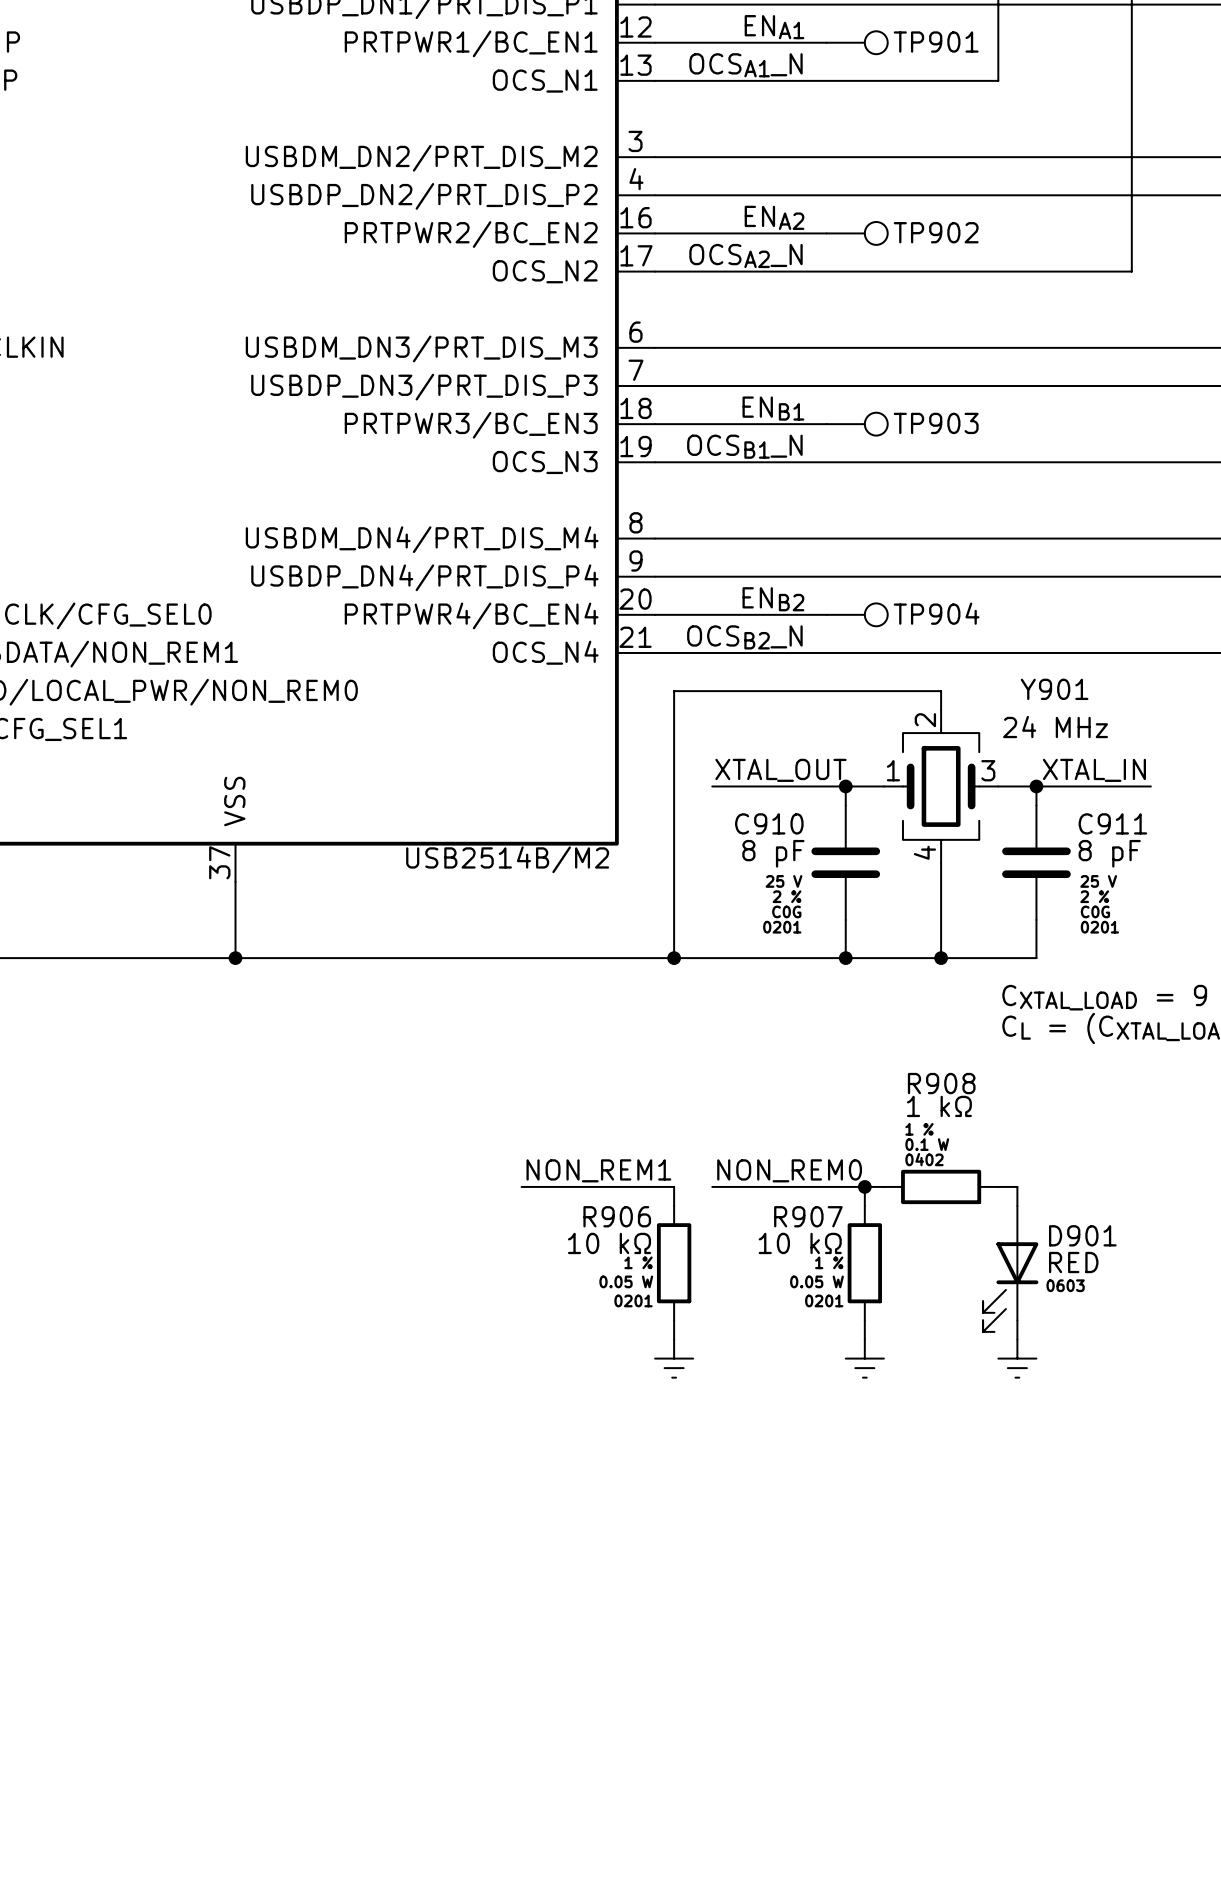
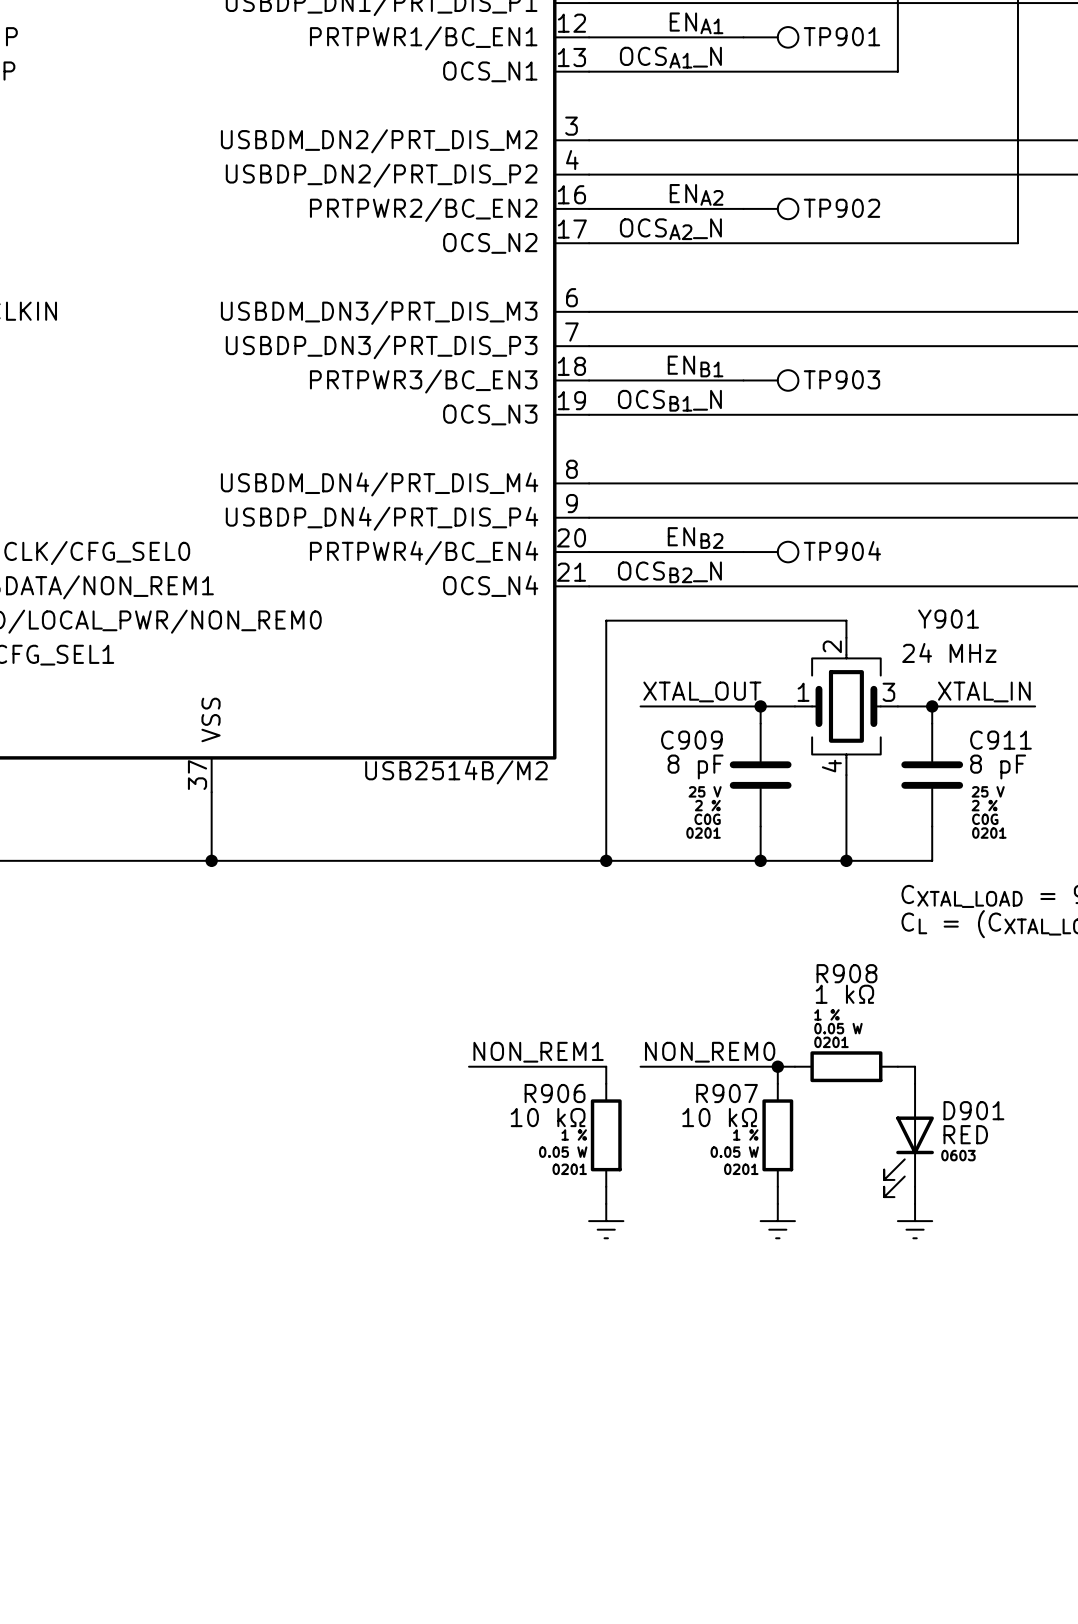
C910 name: C910 (769, 823) -> C909 (691, 740)
R908 text: 0.1 W (927, 1144) -> 0.05 W (838, 1028)
R908 text: 0402 (924, 1159) -> 0201 (831, 1042)

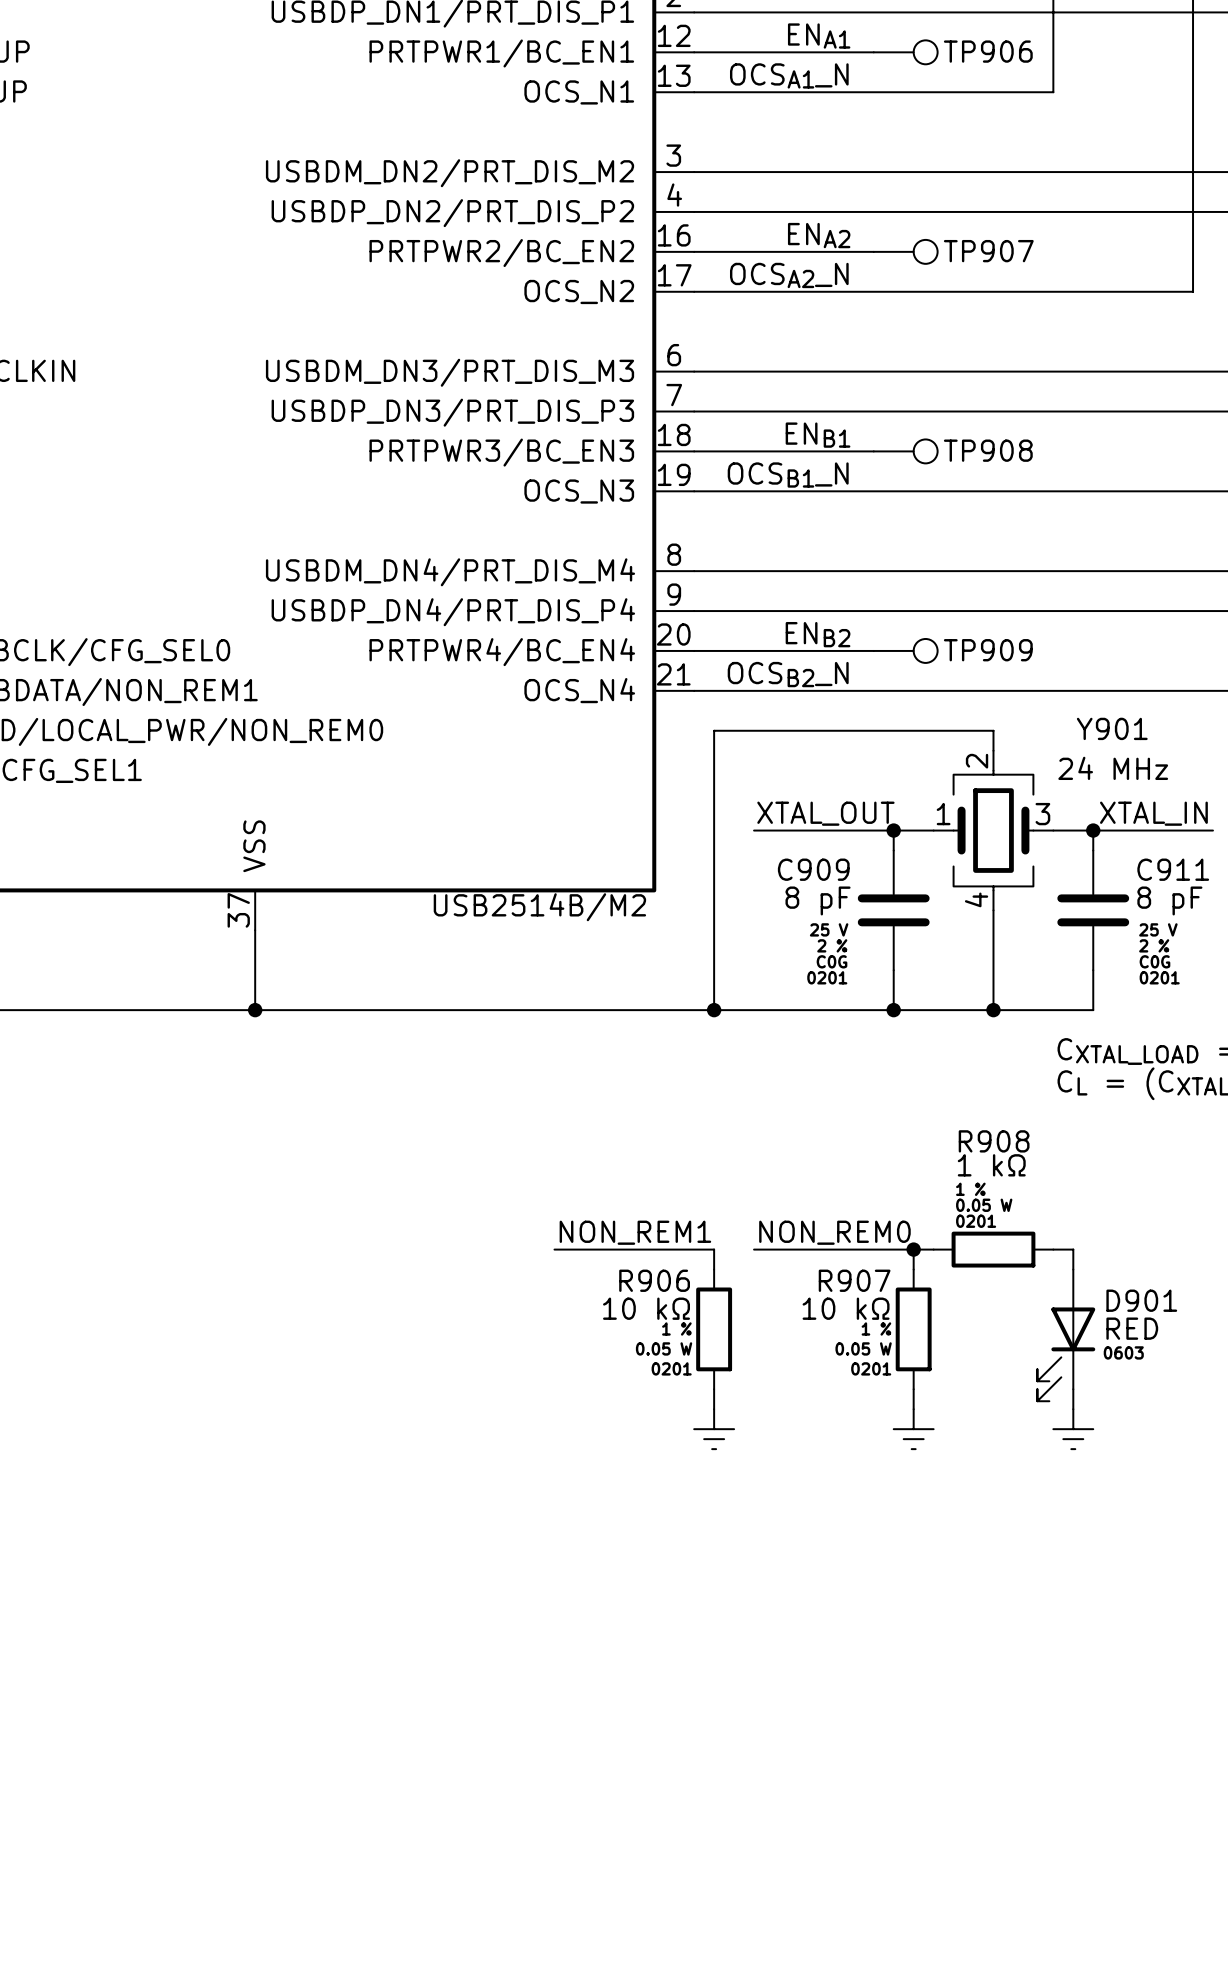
TP901 name: TP901 (841, 36) -> TP906 (988, 51)
TP902 name: TP902 (841, 208) -> TP907 (988, 251)
TP903 name: TP903 (841, 379) -> TP908 (988, 450)
TP904 name: TP904 (842, 550) -> TP909 (988, 650)

